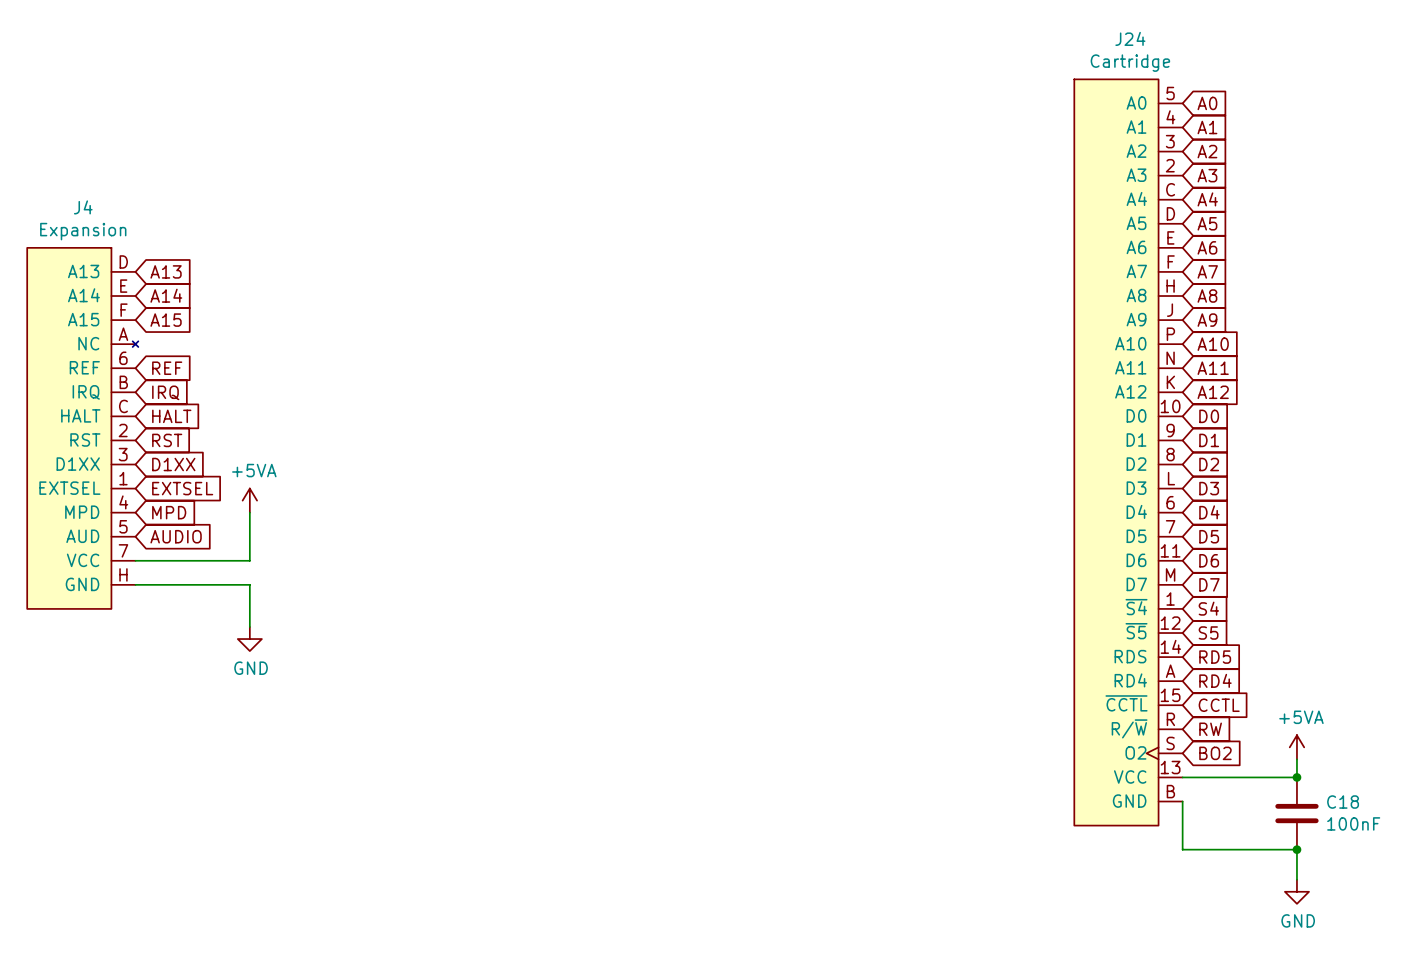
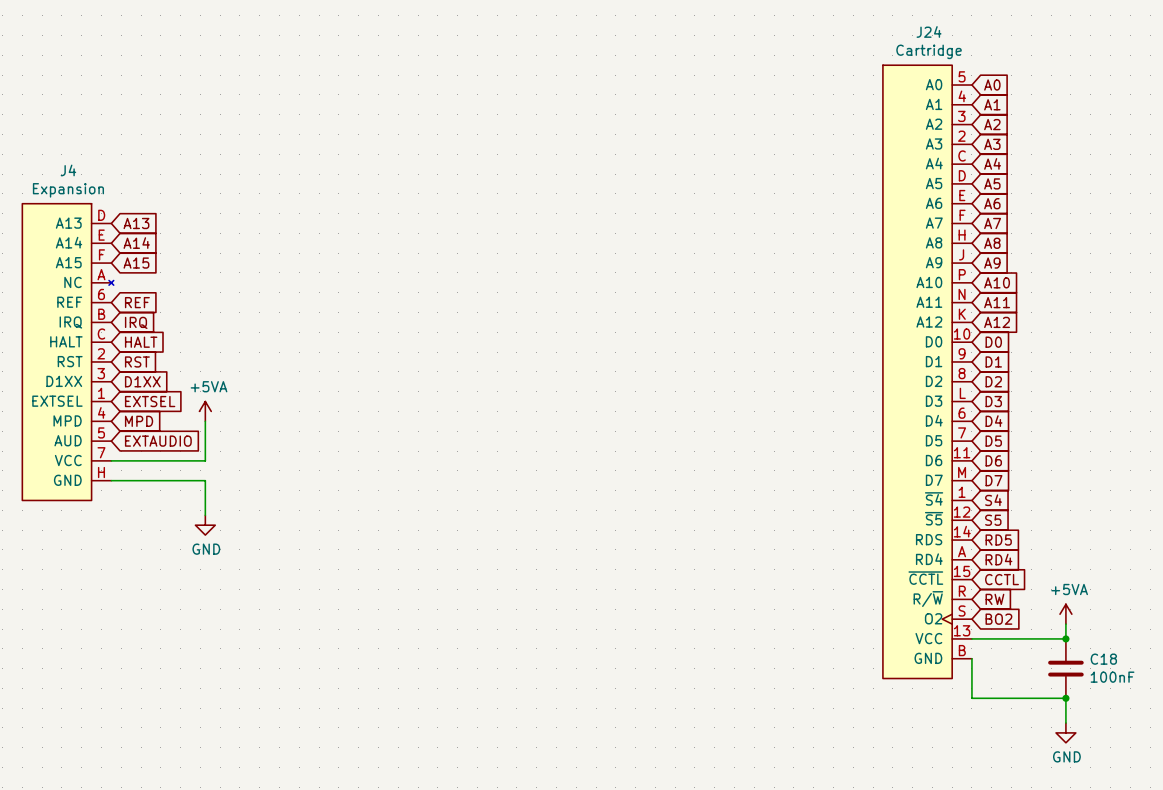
global label: AUDIO (176, 536) -> EXTAUDIO (158, 441)

